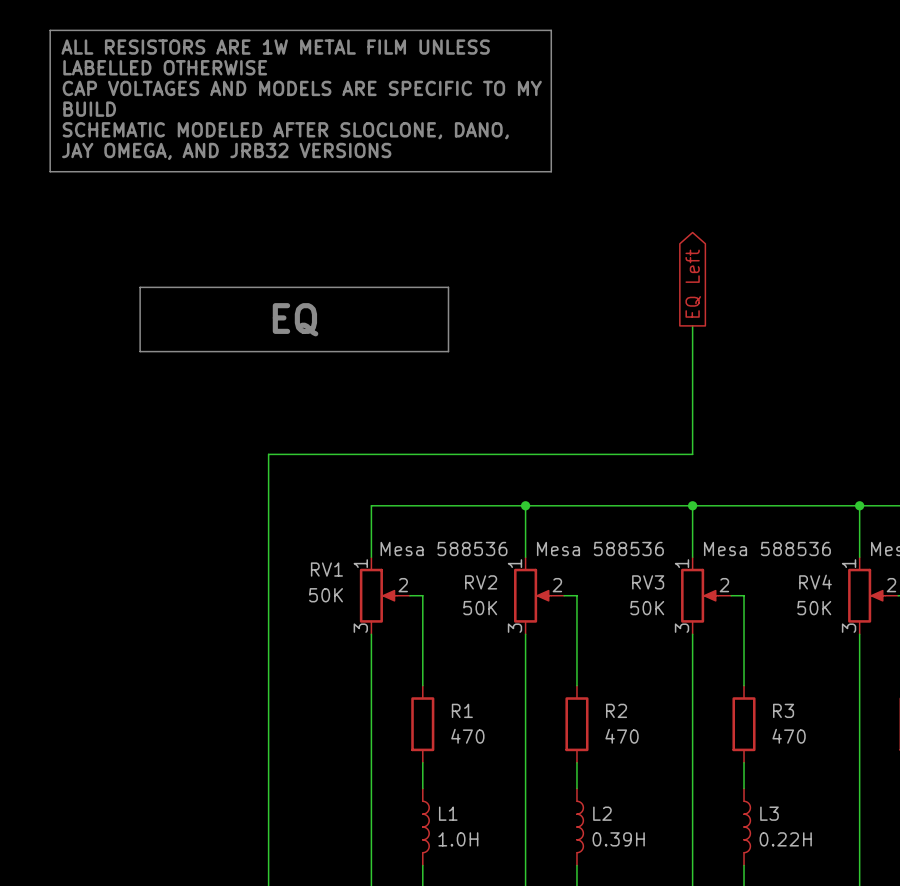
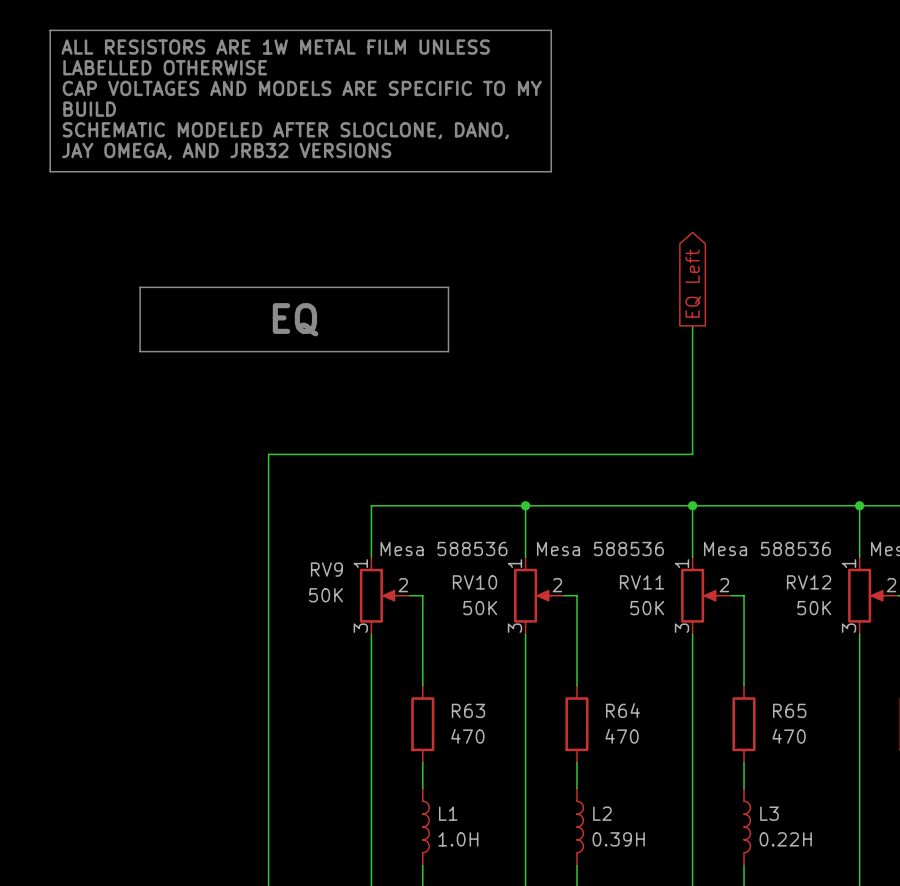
RV1 name: RV1 (326, 569) -> RV9 (326, 569)
RV2 name: RV2 (481, 582) -> RV10 (475, 582)
RV3 name: RV3 (648, 582) -> RV11 (642, 582)
RV4 name: RV4 (815, 582) -> RV12 (809, 582)
R1 name: R1 (462, 710) -> R63 (468, 710)
R2 name: R2 (616, 710) -> R64 (622, 710)
R3 name: R3 (783, 710) -> R65 (789, 710)

